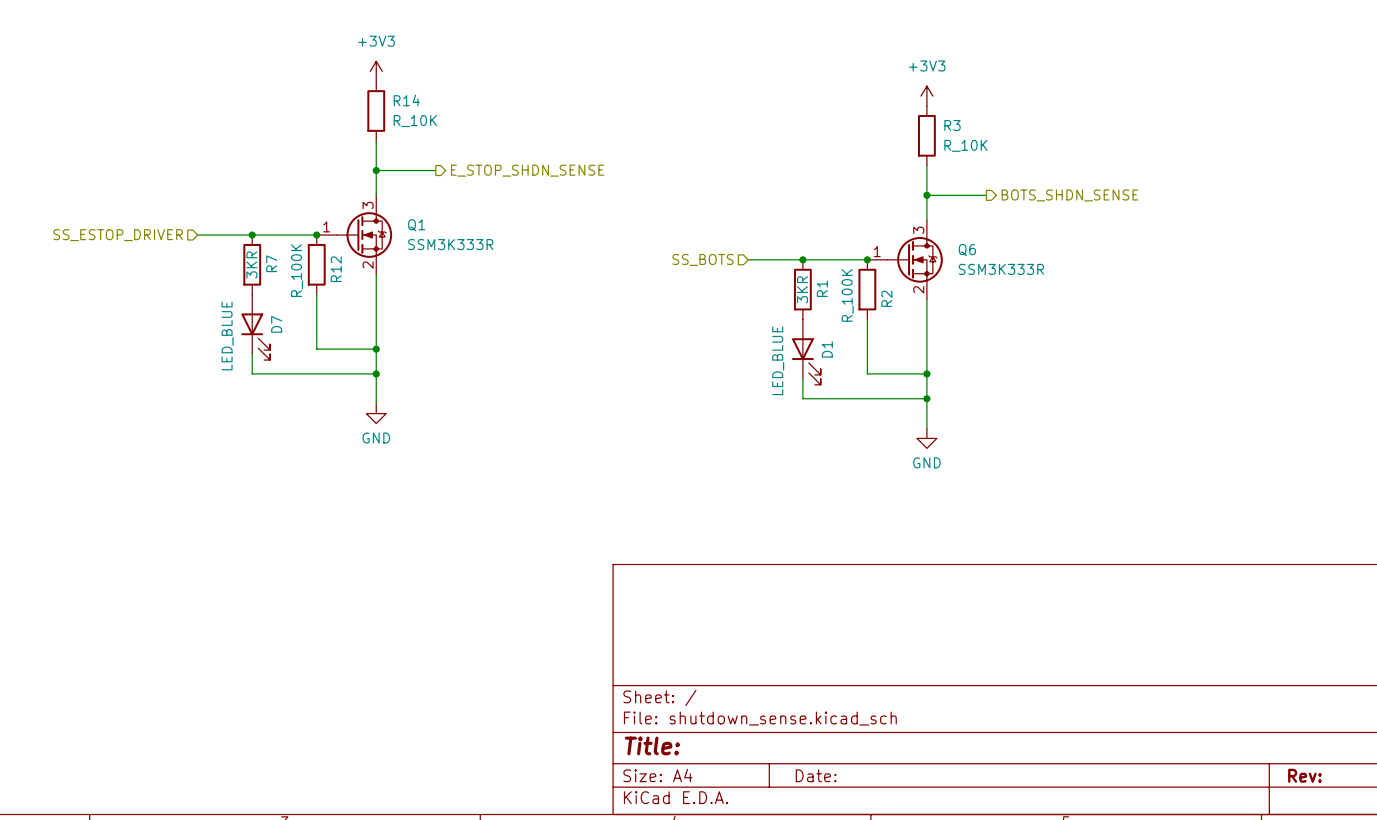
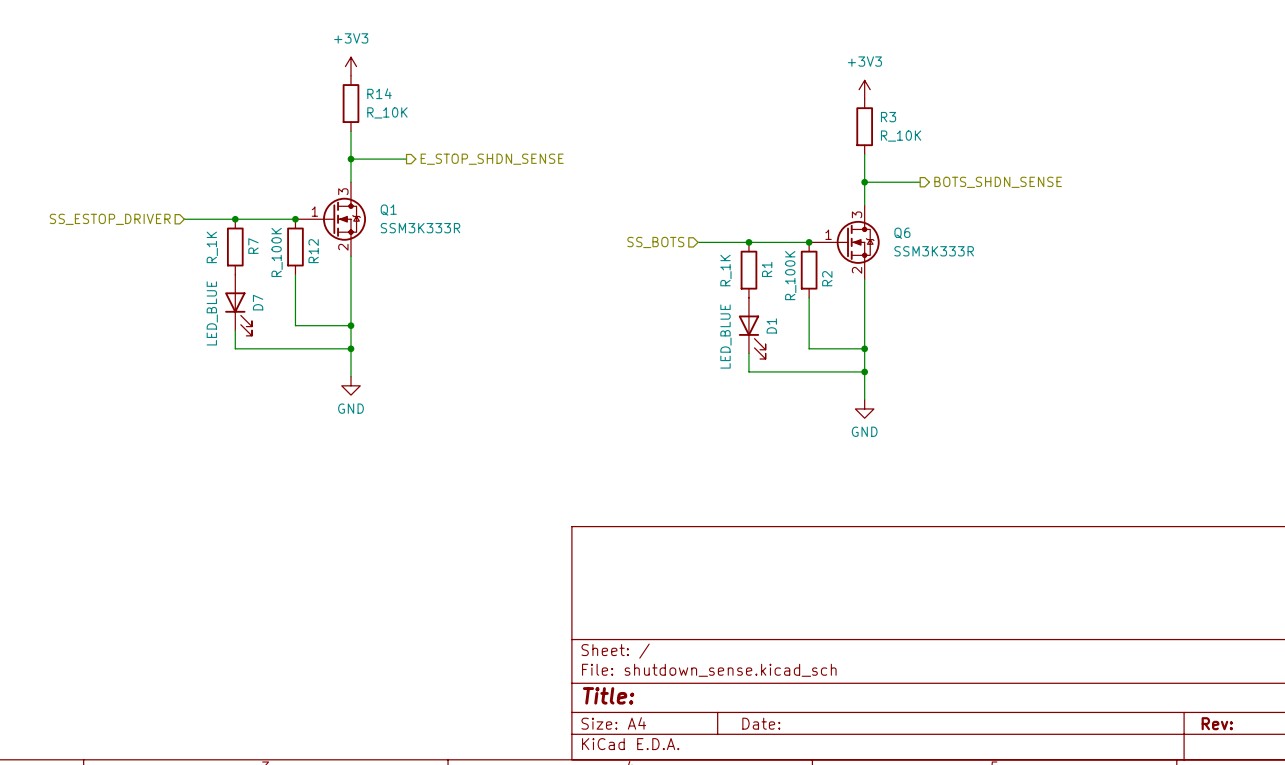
Q1 symbol: [316, 195, 393, 275] -> [295, 182, 366, 257]
Q6 symbol: [867, 220, 943, 300] -> [809, 205, 880, 280]
R7 value: 3KR (251, 265) -> R_1K (212, 247)
R1 value: 3KR (802, 289) -> R_1K (725, 270)

